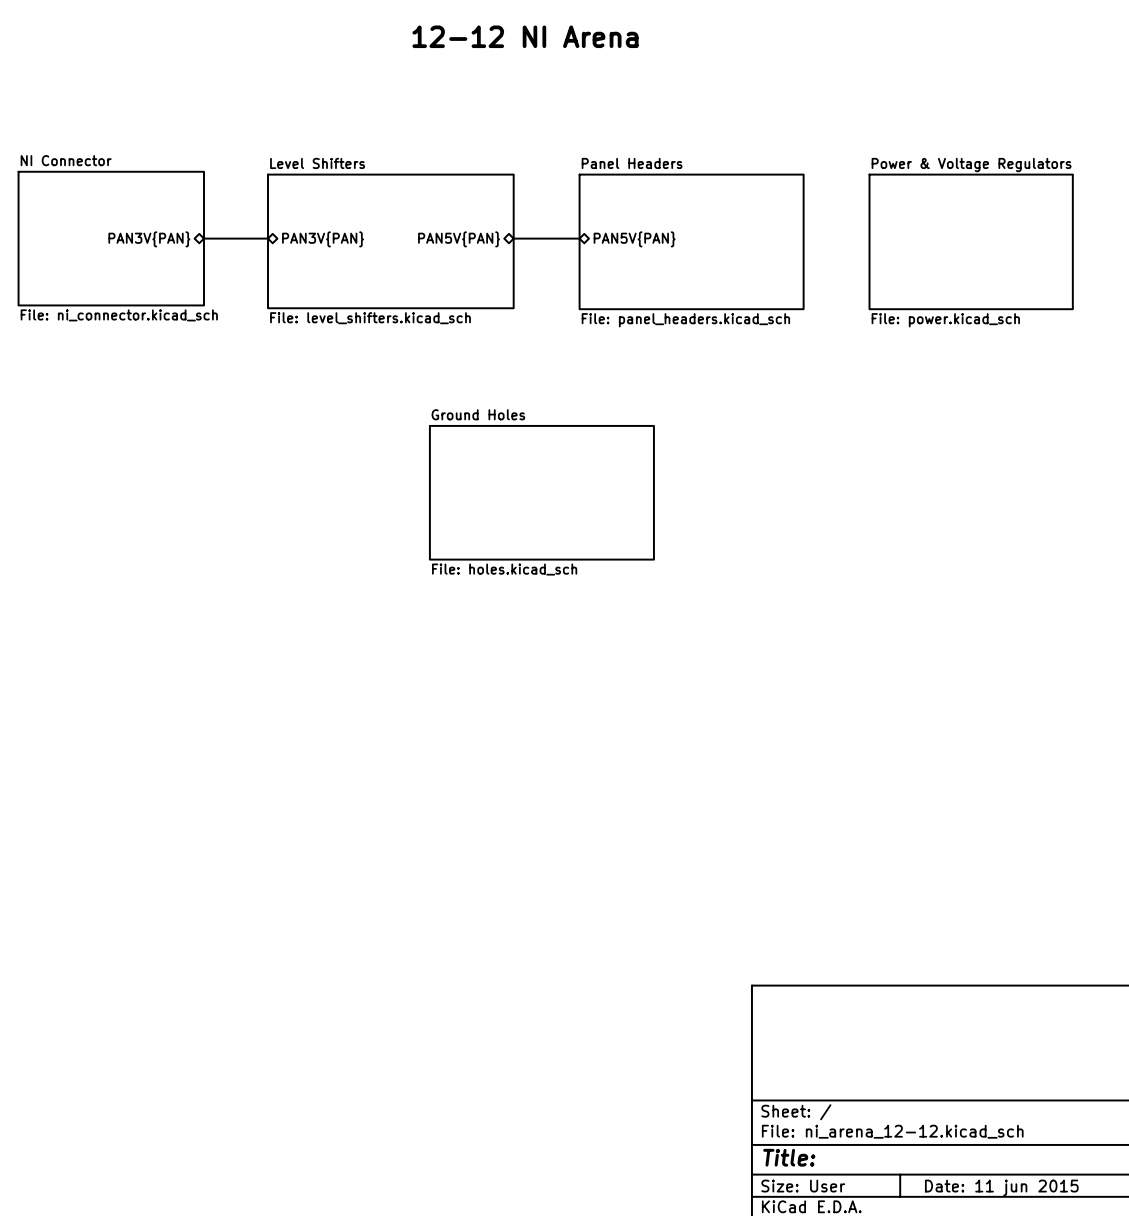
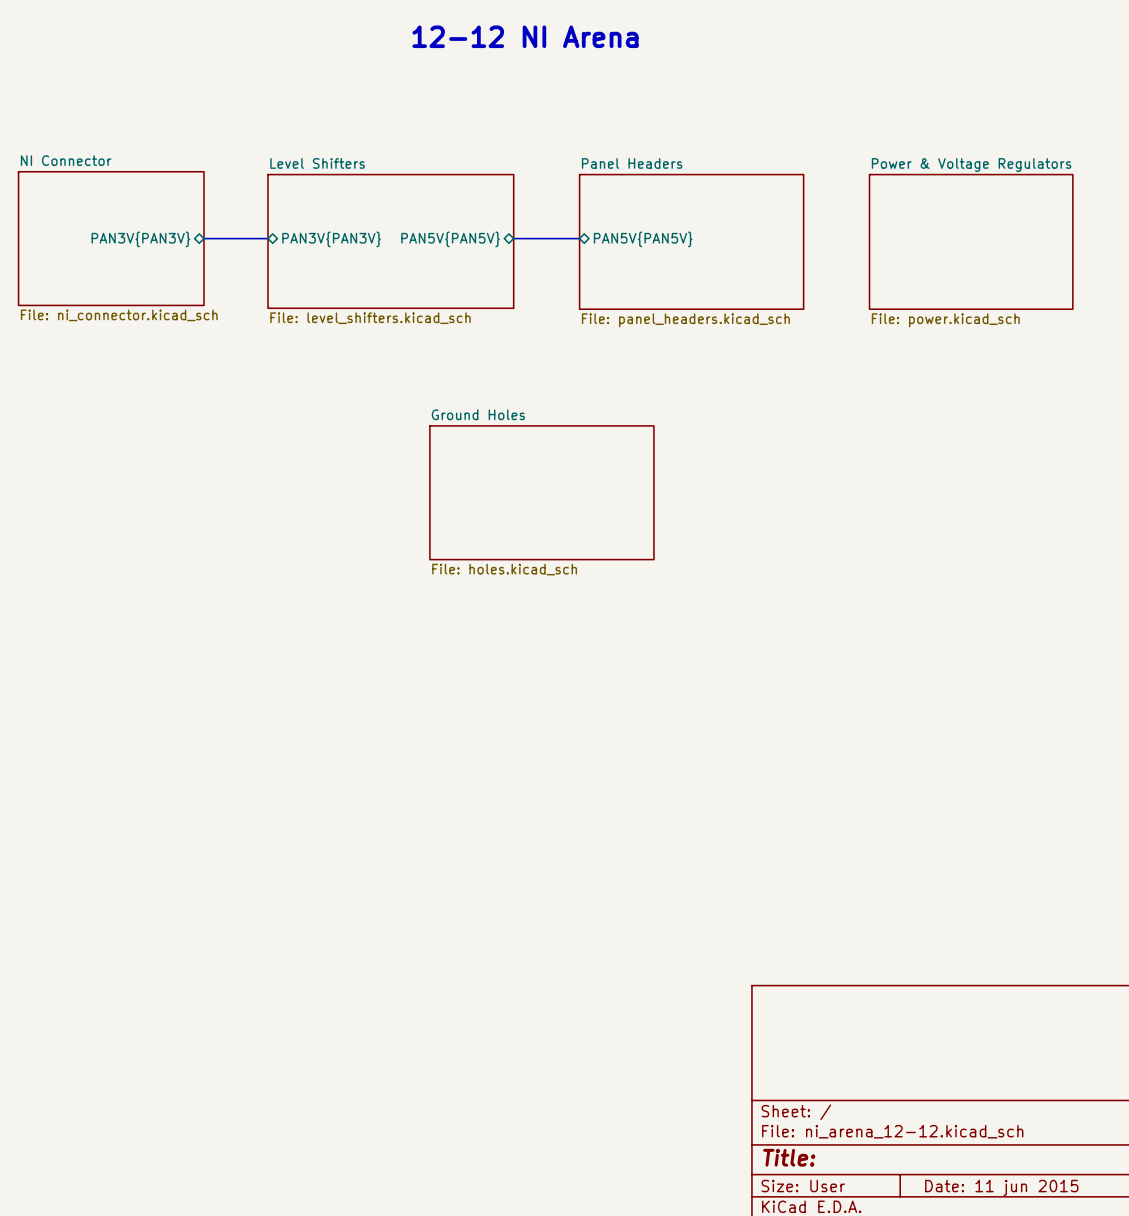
sheet pin: PAN3V{PAN} (149, 239) -> PAN3V{PAN3V} (140, 239)
sheet pin: PAN3V{PAN} (323, 239) -> PAN3V{PAN3V} (331, 239)
sheet pin: PAN5V{PAN} (459, 239) -> PAN5V{PAN5V} (450, 239)
sheet pin: PAN5V{PAN} (634, 239) -> PAN5V{PAN5V} (643, 239)

